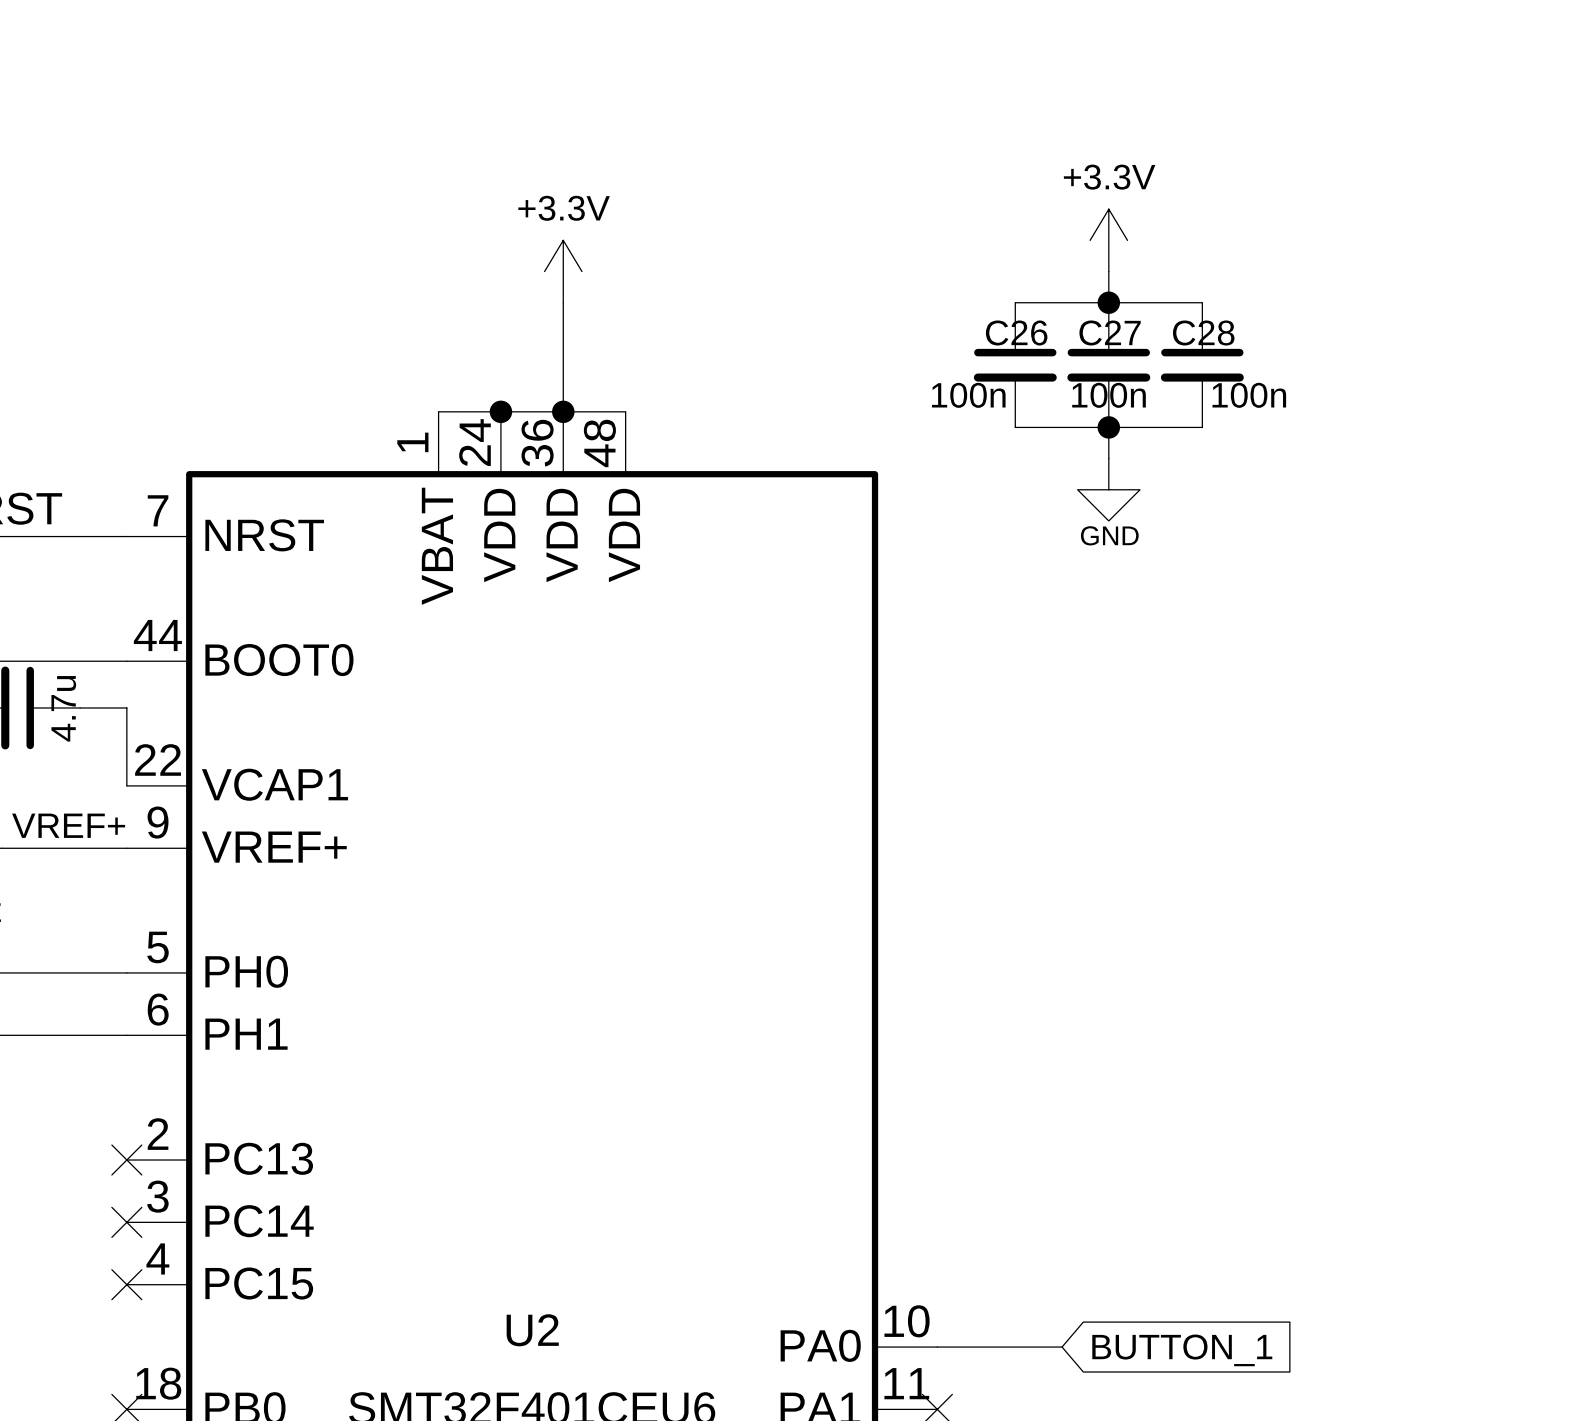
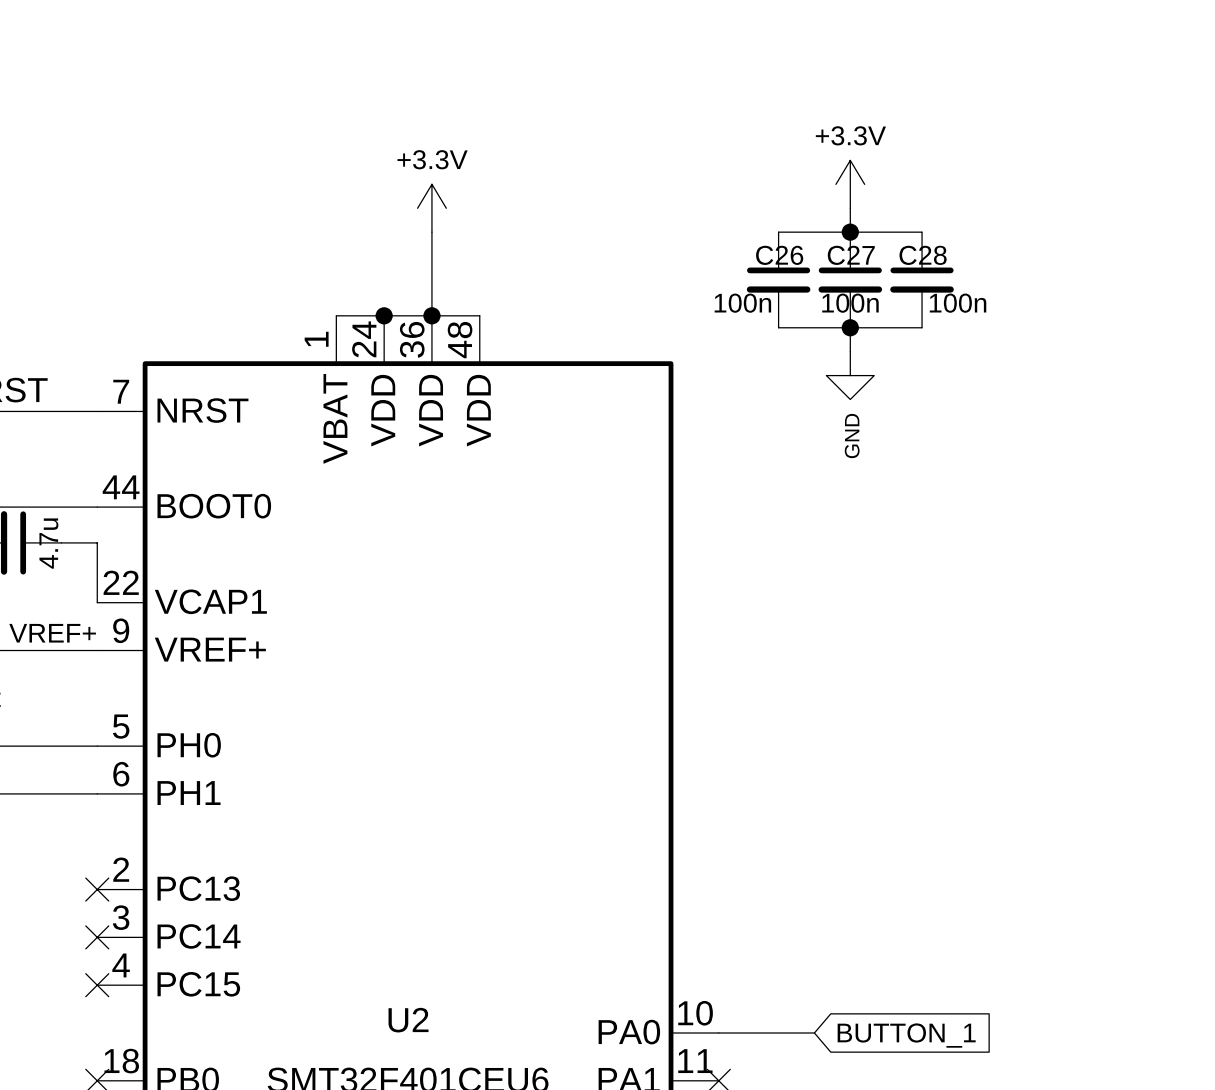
power symbol text rotation: 0° (1109, 535) -> 90° counterclockwise (852, 436)

